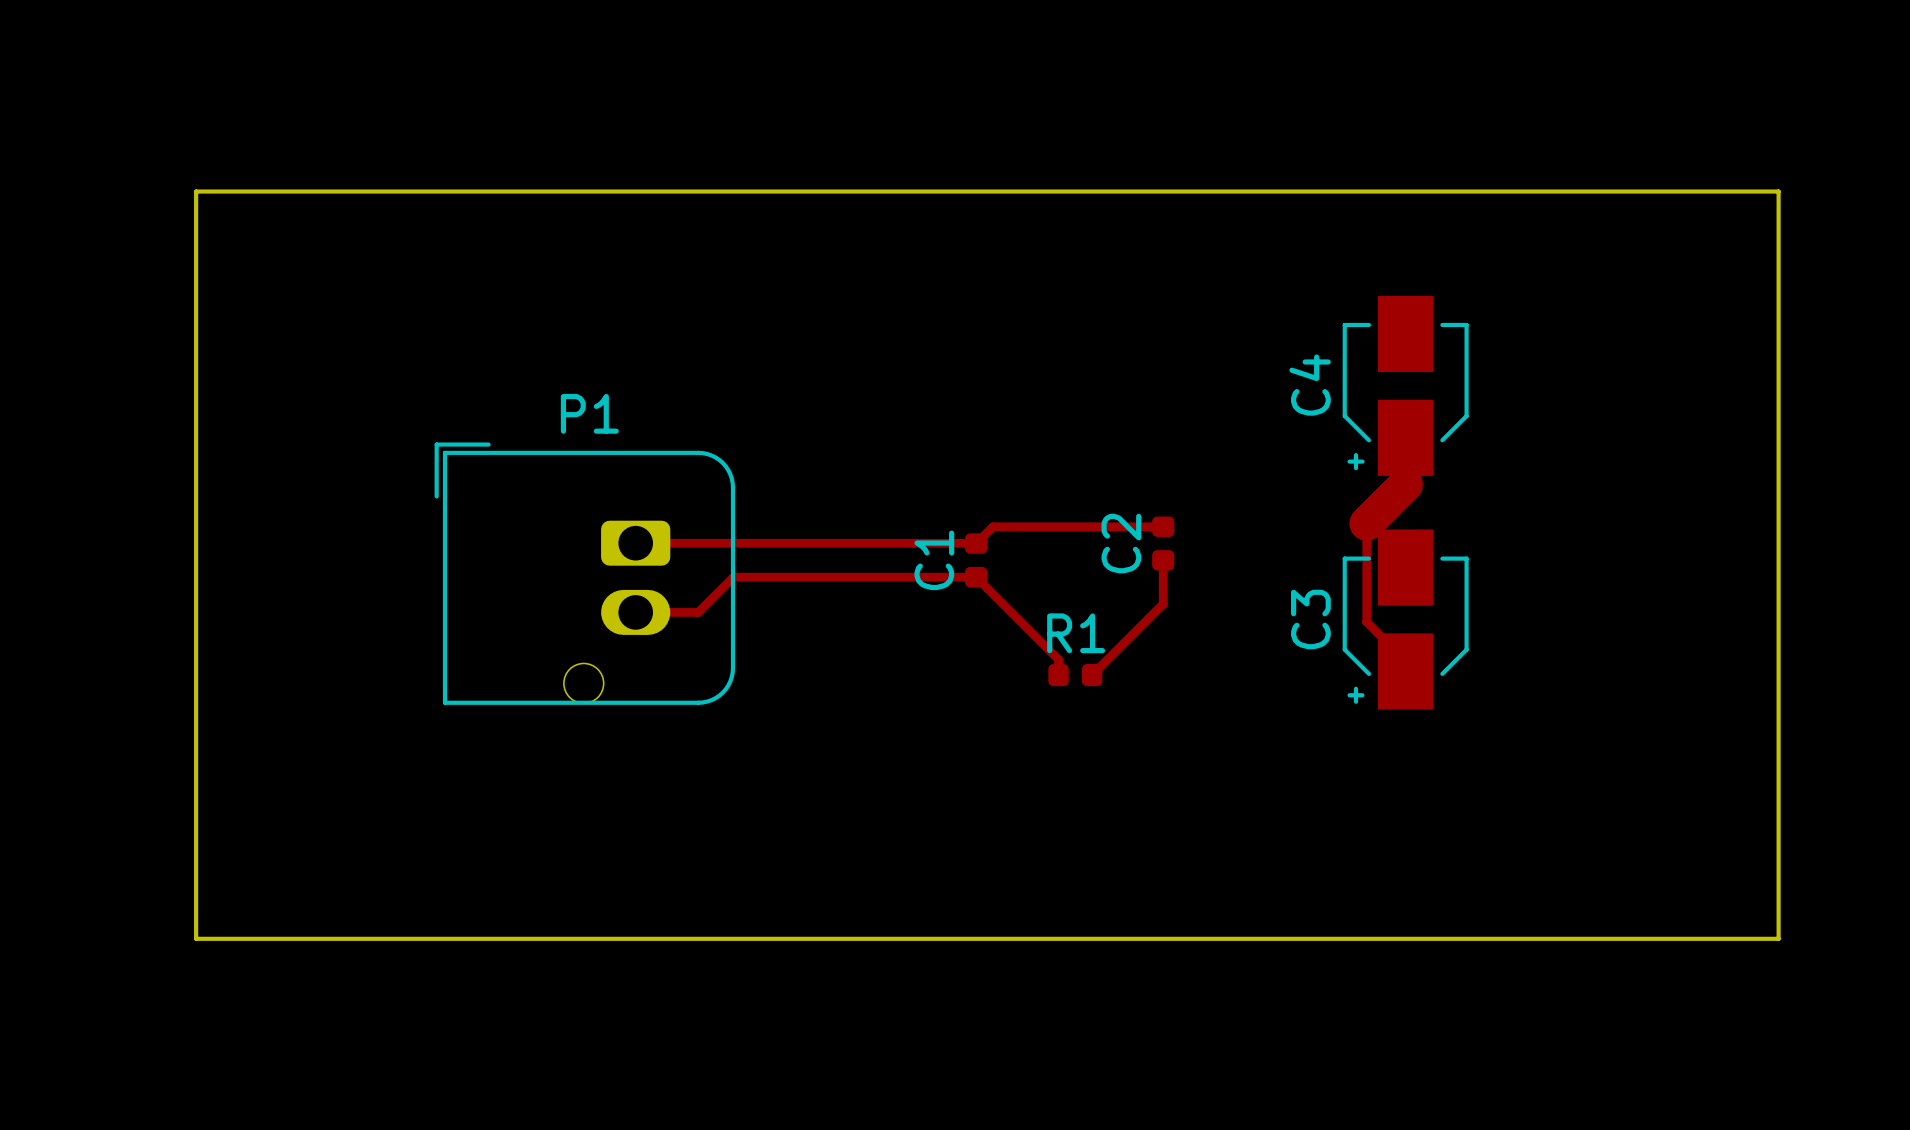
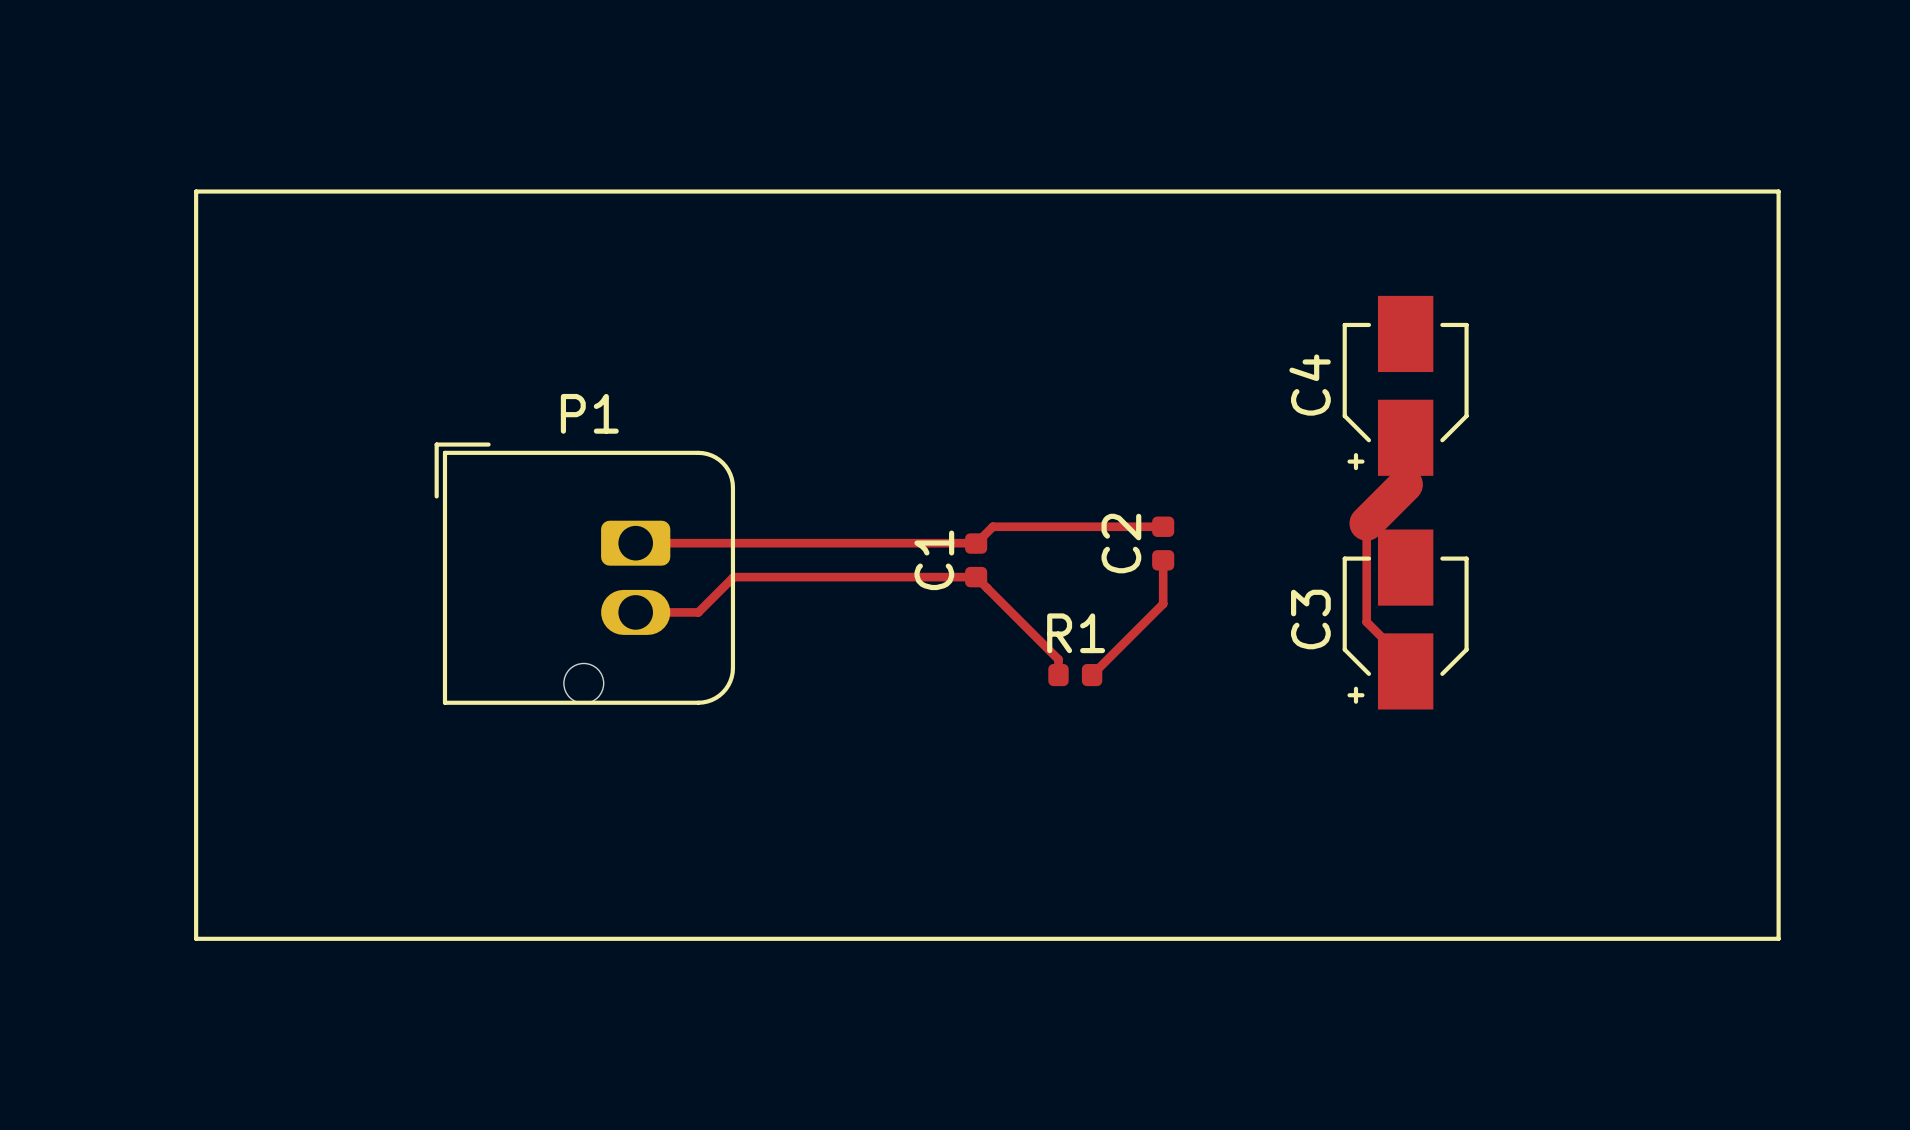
board edge: (196, 191) (1778, 191) (1778, 938) (196, 938) (196, 191) -> none
line: none -> (196, 191) (1778, 191) (1778, 938) (196, 938) (196, 191)

